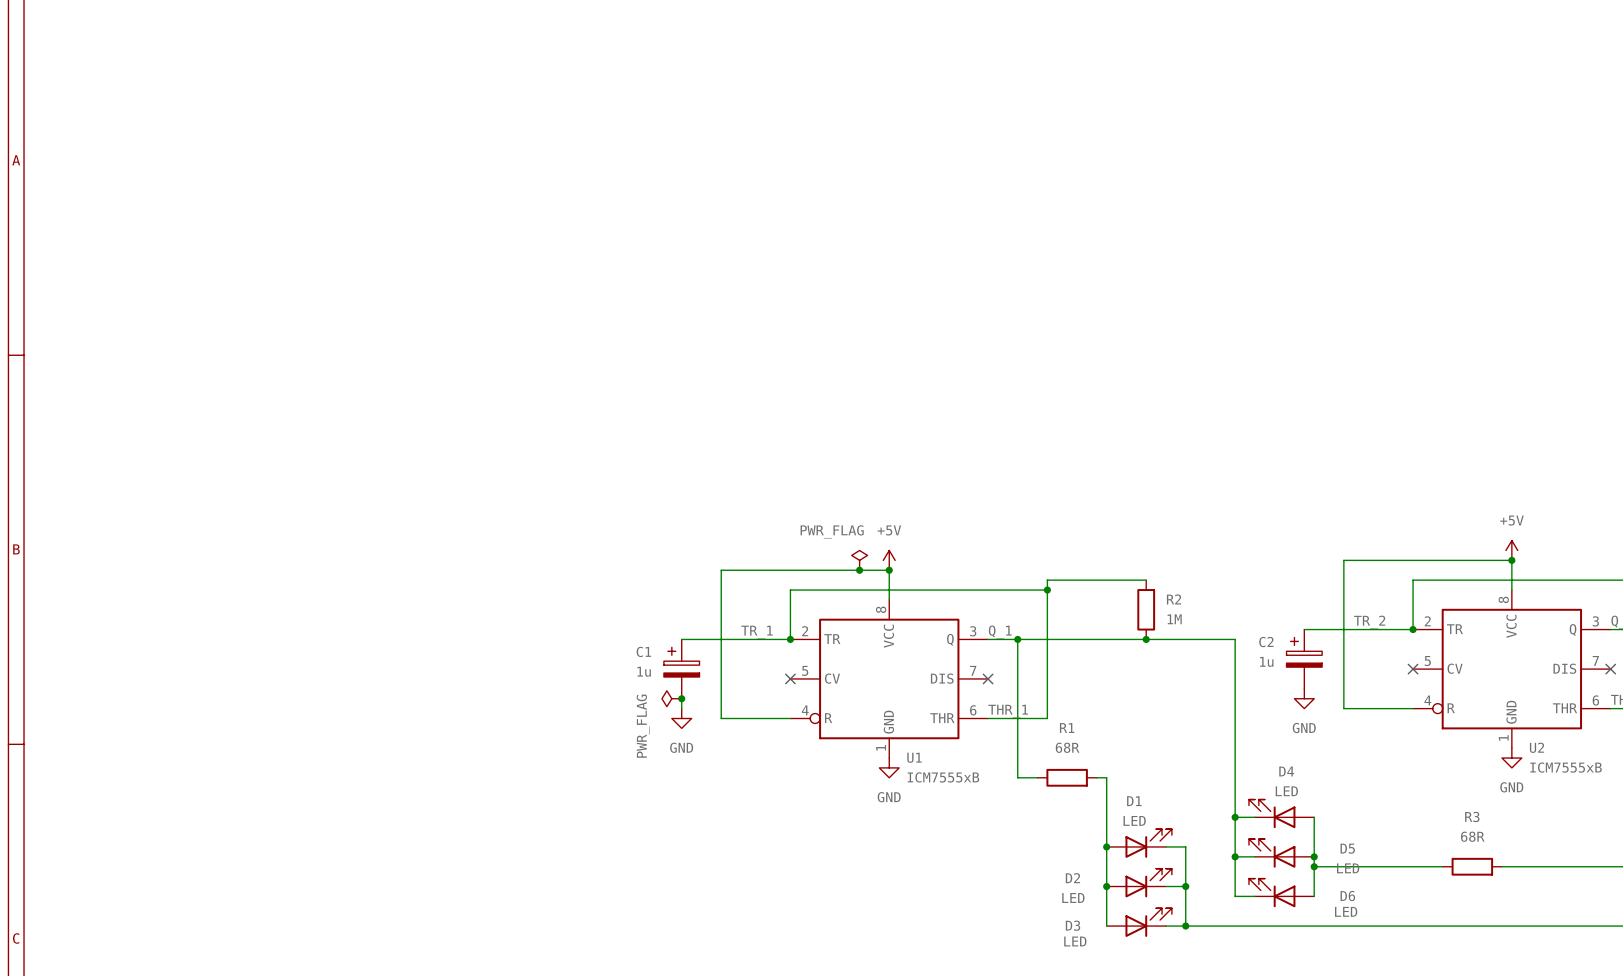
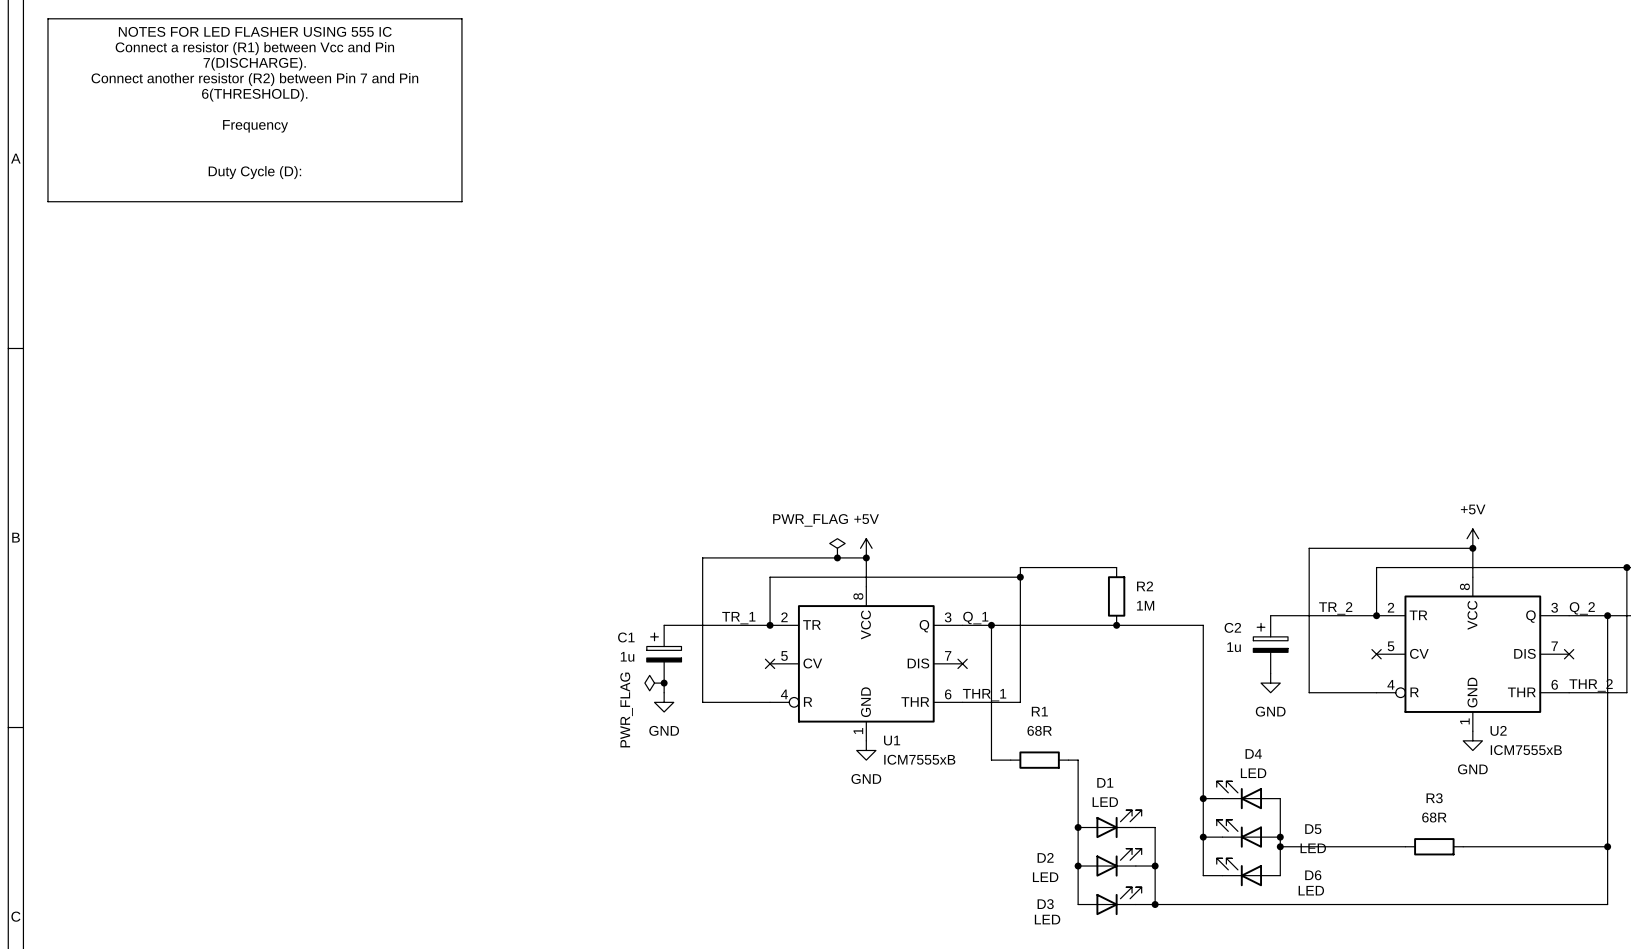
line: none -> (47, 18) (461, 18) (461, 201) (47, 201) (47, 18)
text: none -> NOTES FOR LED FLASHER USING 555 IC (255, 31)
text: none -> Connect a resistor (R1) between Vcc and Pin (254, 48)
text: none -> 7(DISCHARGE). (254, 64)
text: none -> Connect another resistor (R2) between Pin 7 and Pin (254, 79)
text: none -> 6(THRESHOLD). (254, 95)
text: none -> Frequency (255, 126)
text: none -> Duty Cycle (D): (254, 172)

